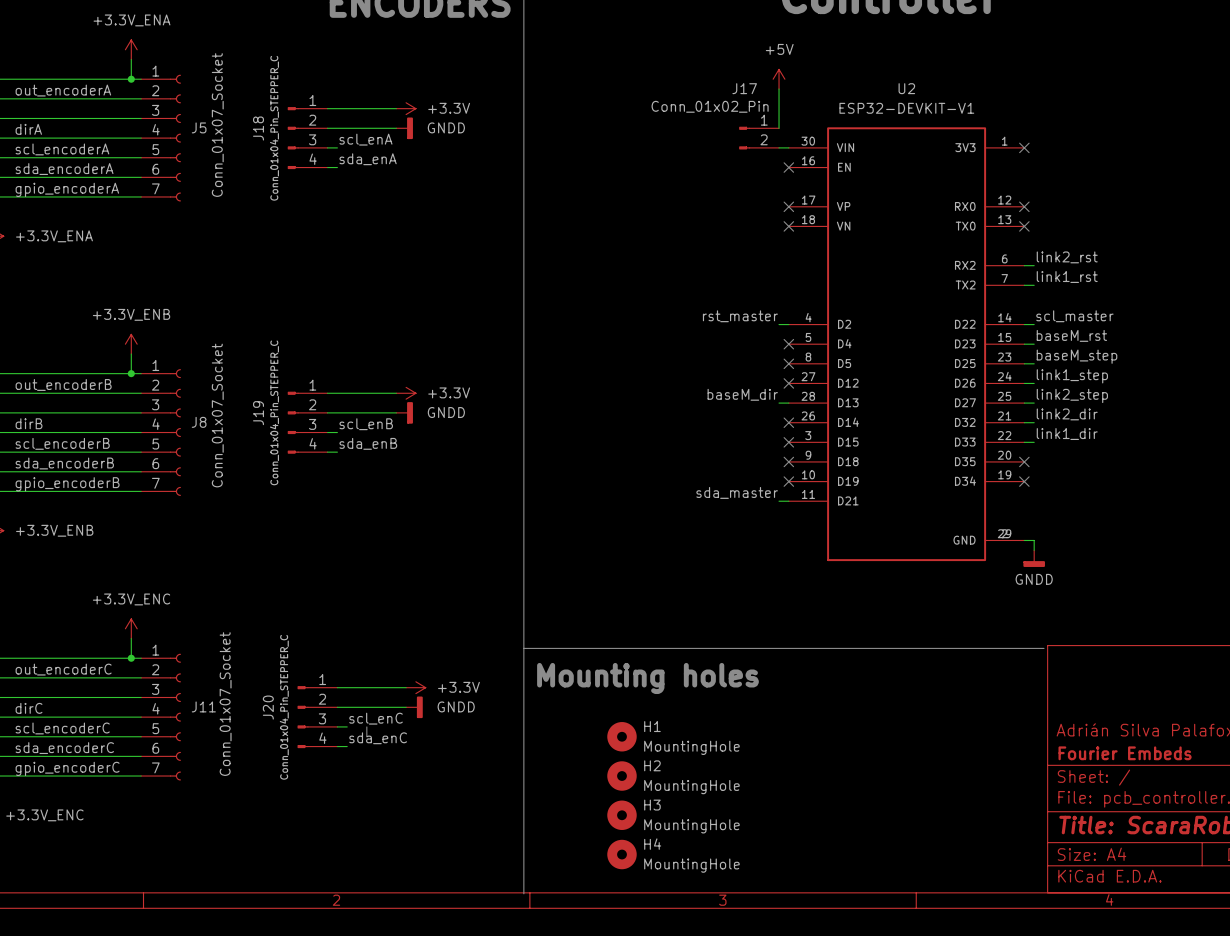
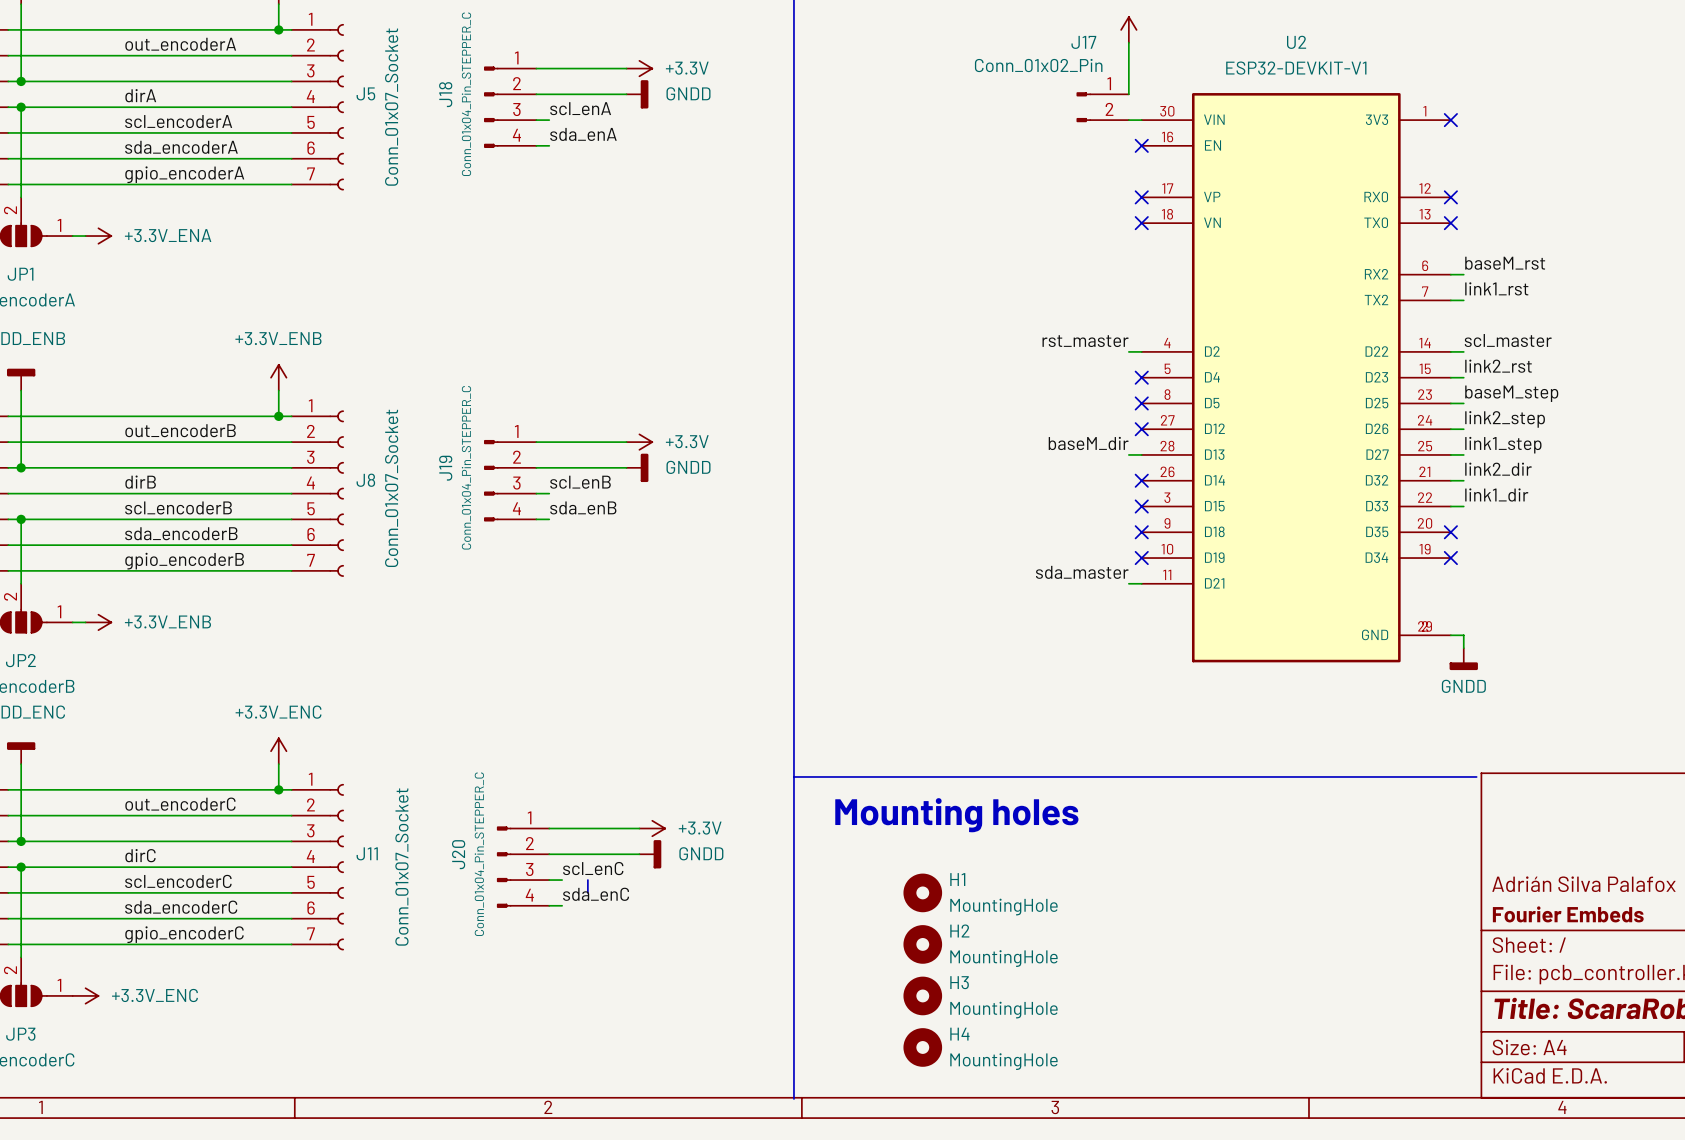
label: link2_rst (1067, 257) -> baseM_rst (1505, 263)
label: baseM_rst (1071, 335) -> link2_rst (1498, 366)
label: link1_step (1072, 376) -> link2_step (1505, 419)
label: link2_step (1072, 395) -> link1_step (1503, 445)

